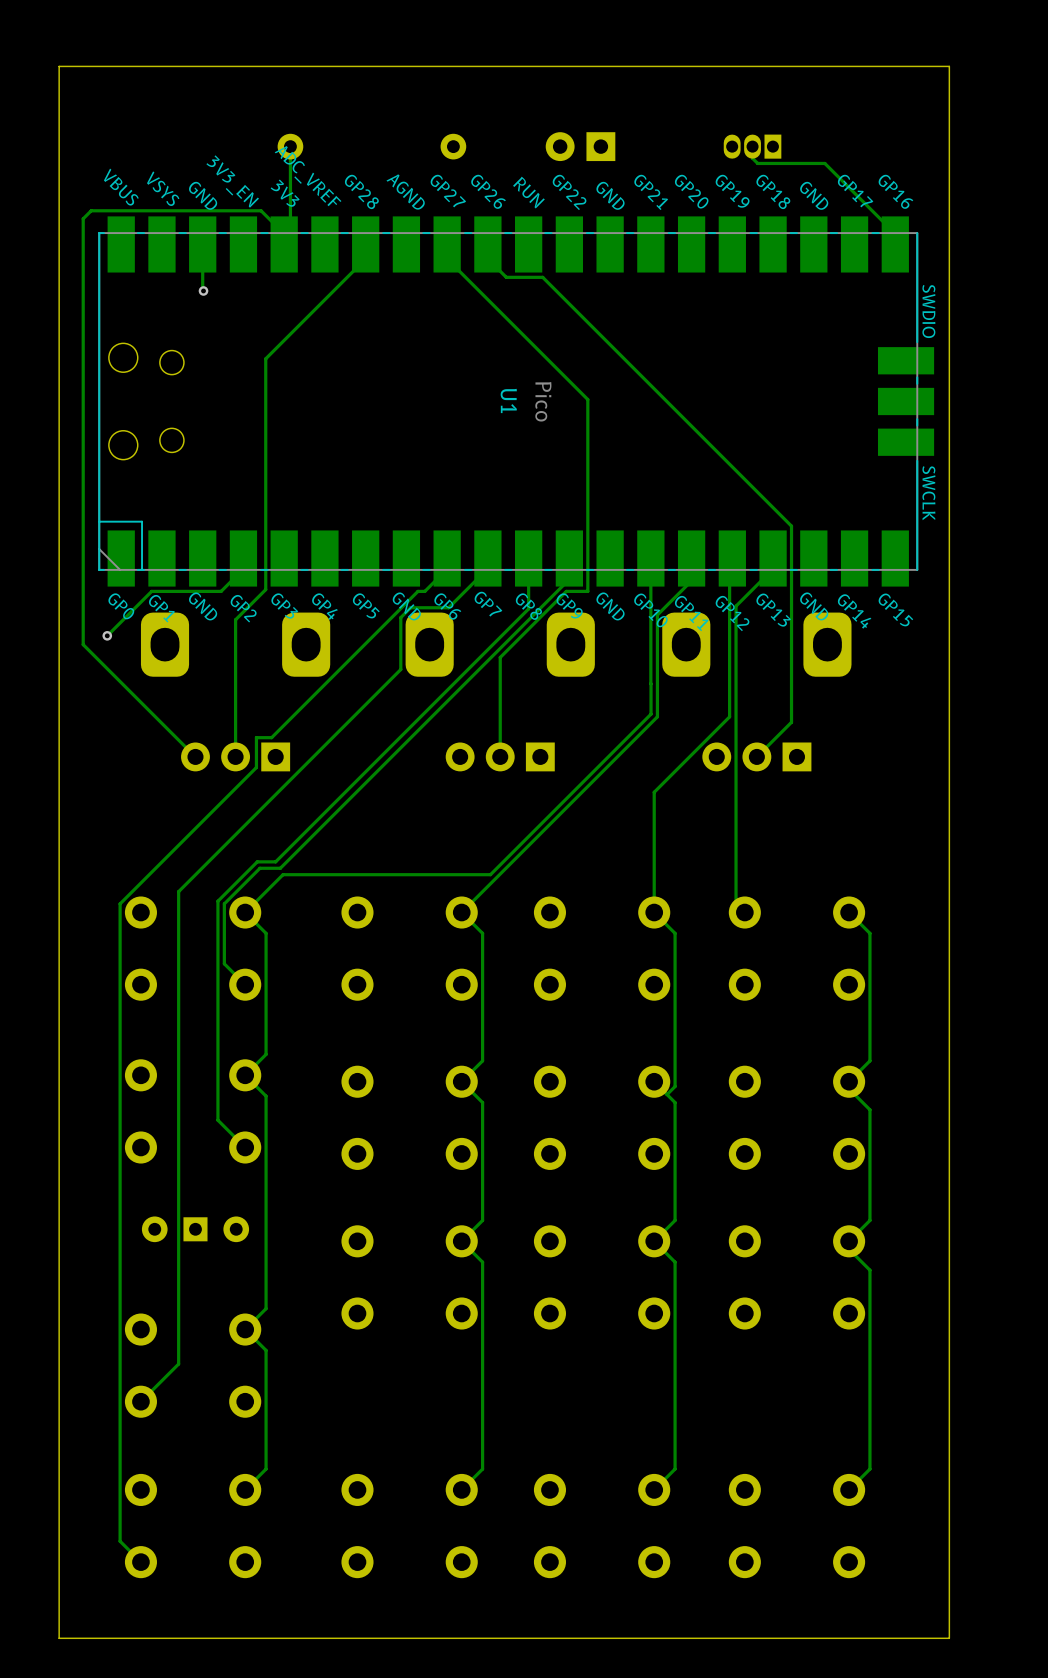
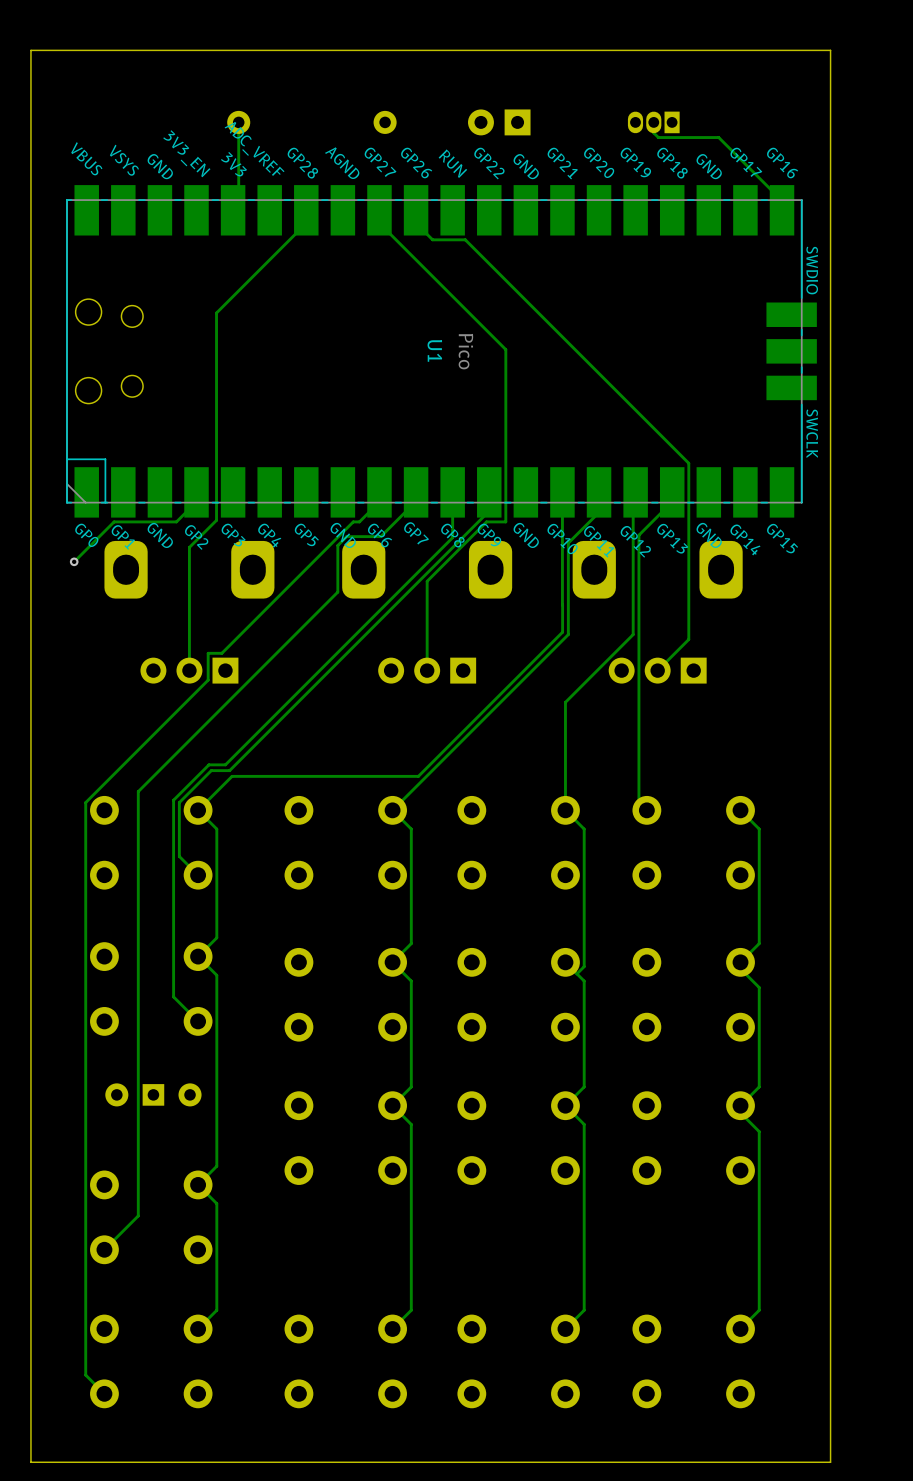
track: (202, 258) (203, 290) -> none
track: (284, 258) (284, 233) (261, 210) (91, 210) (83, 218) (83, 644) (195, 756) -> none
via: (203, 290) -> none

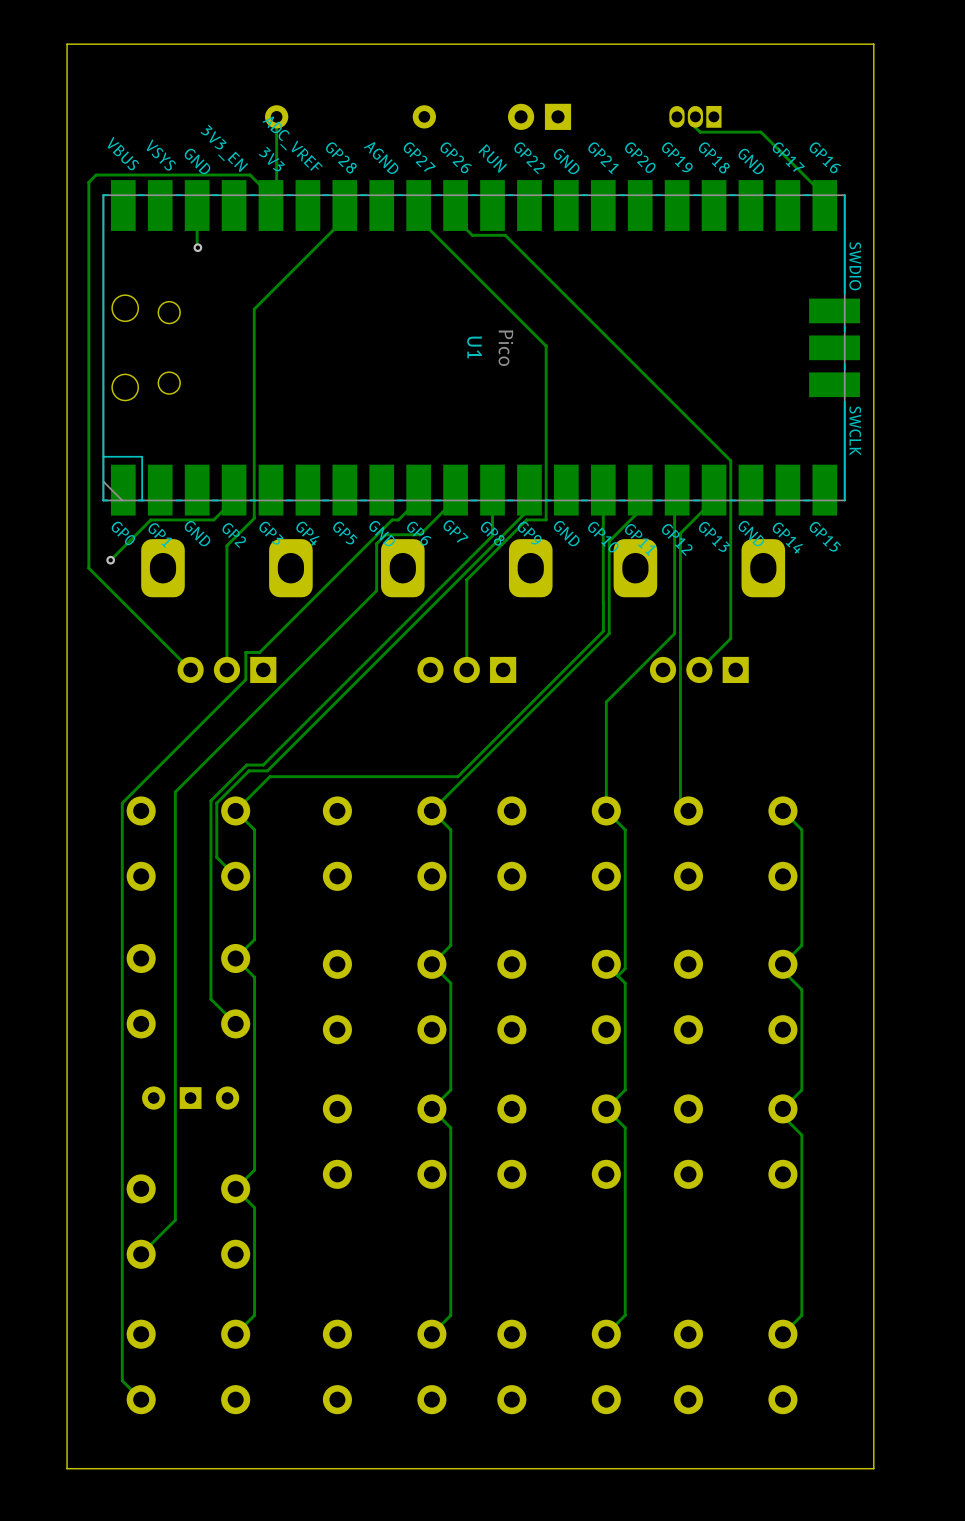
track: none -> (197, 218) (197, 247)
track: none -> (270, 218) (270, 195) (250, 175) (96, 175) (88, 182) (88, 568) (190, 669)
via: none -> (197, 247)

